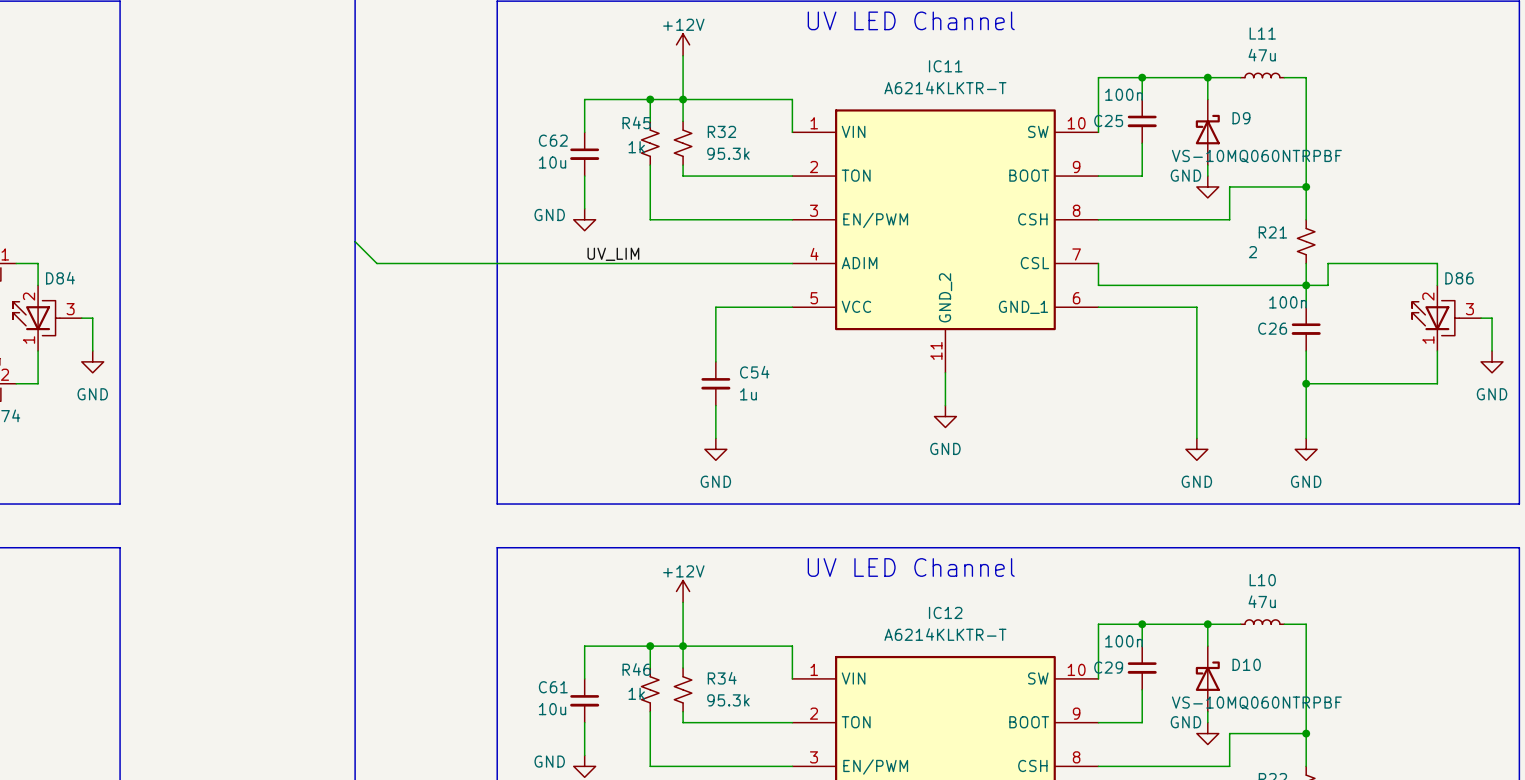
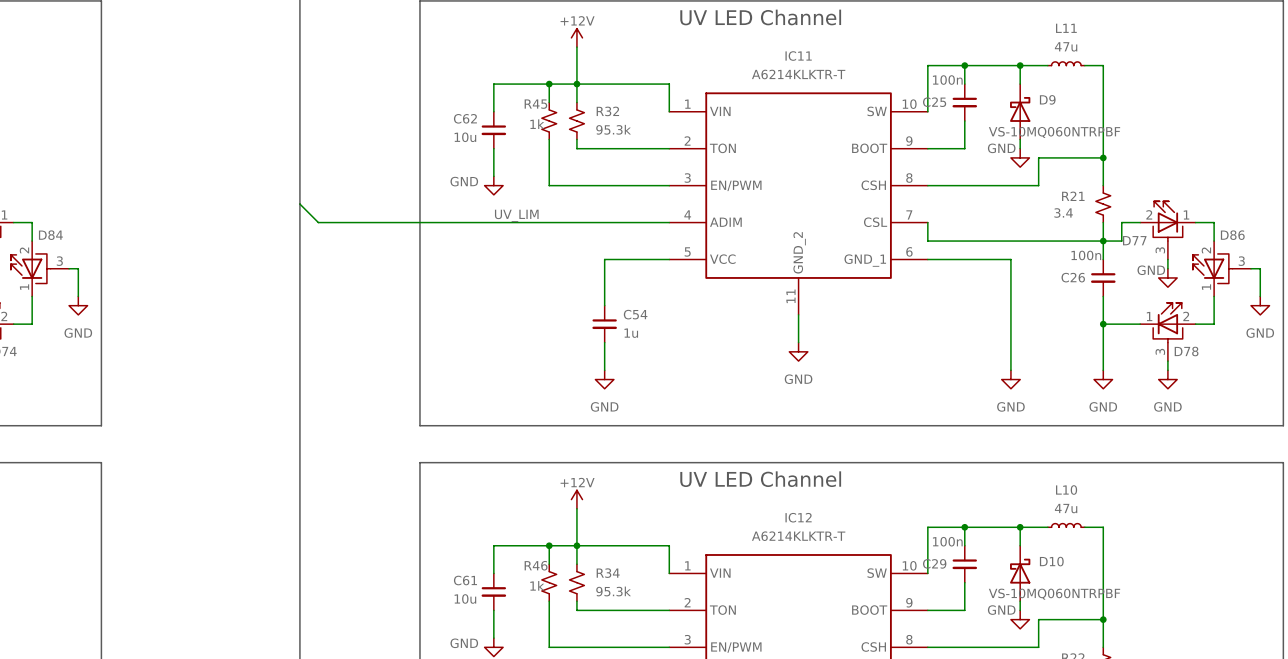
R21 value: 2 (1252, 252) -> 3.4 (1063, 213)
D77: none -> (1167, 230)
wire: none -> (1167, 259) (1167, 268)
power symbol: none -> GND (1167, 277)
D78: none -> (1167, 331)
wire: none -> (1167, 361) (1167, 370)
power symbol: none -> GND (1167, 379)

